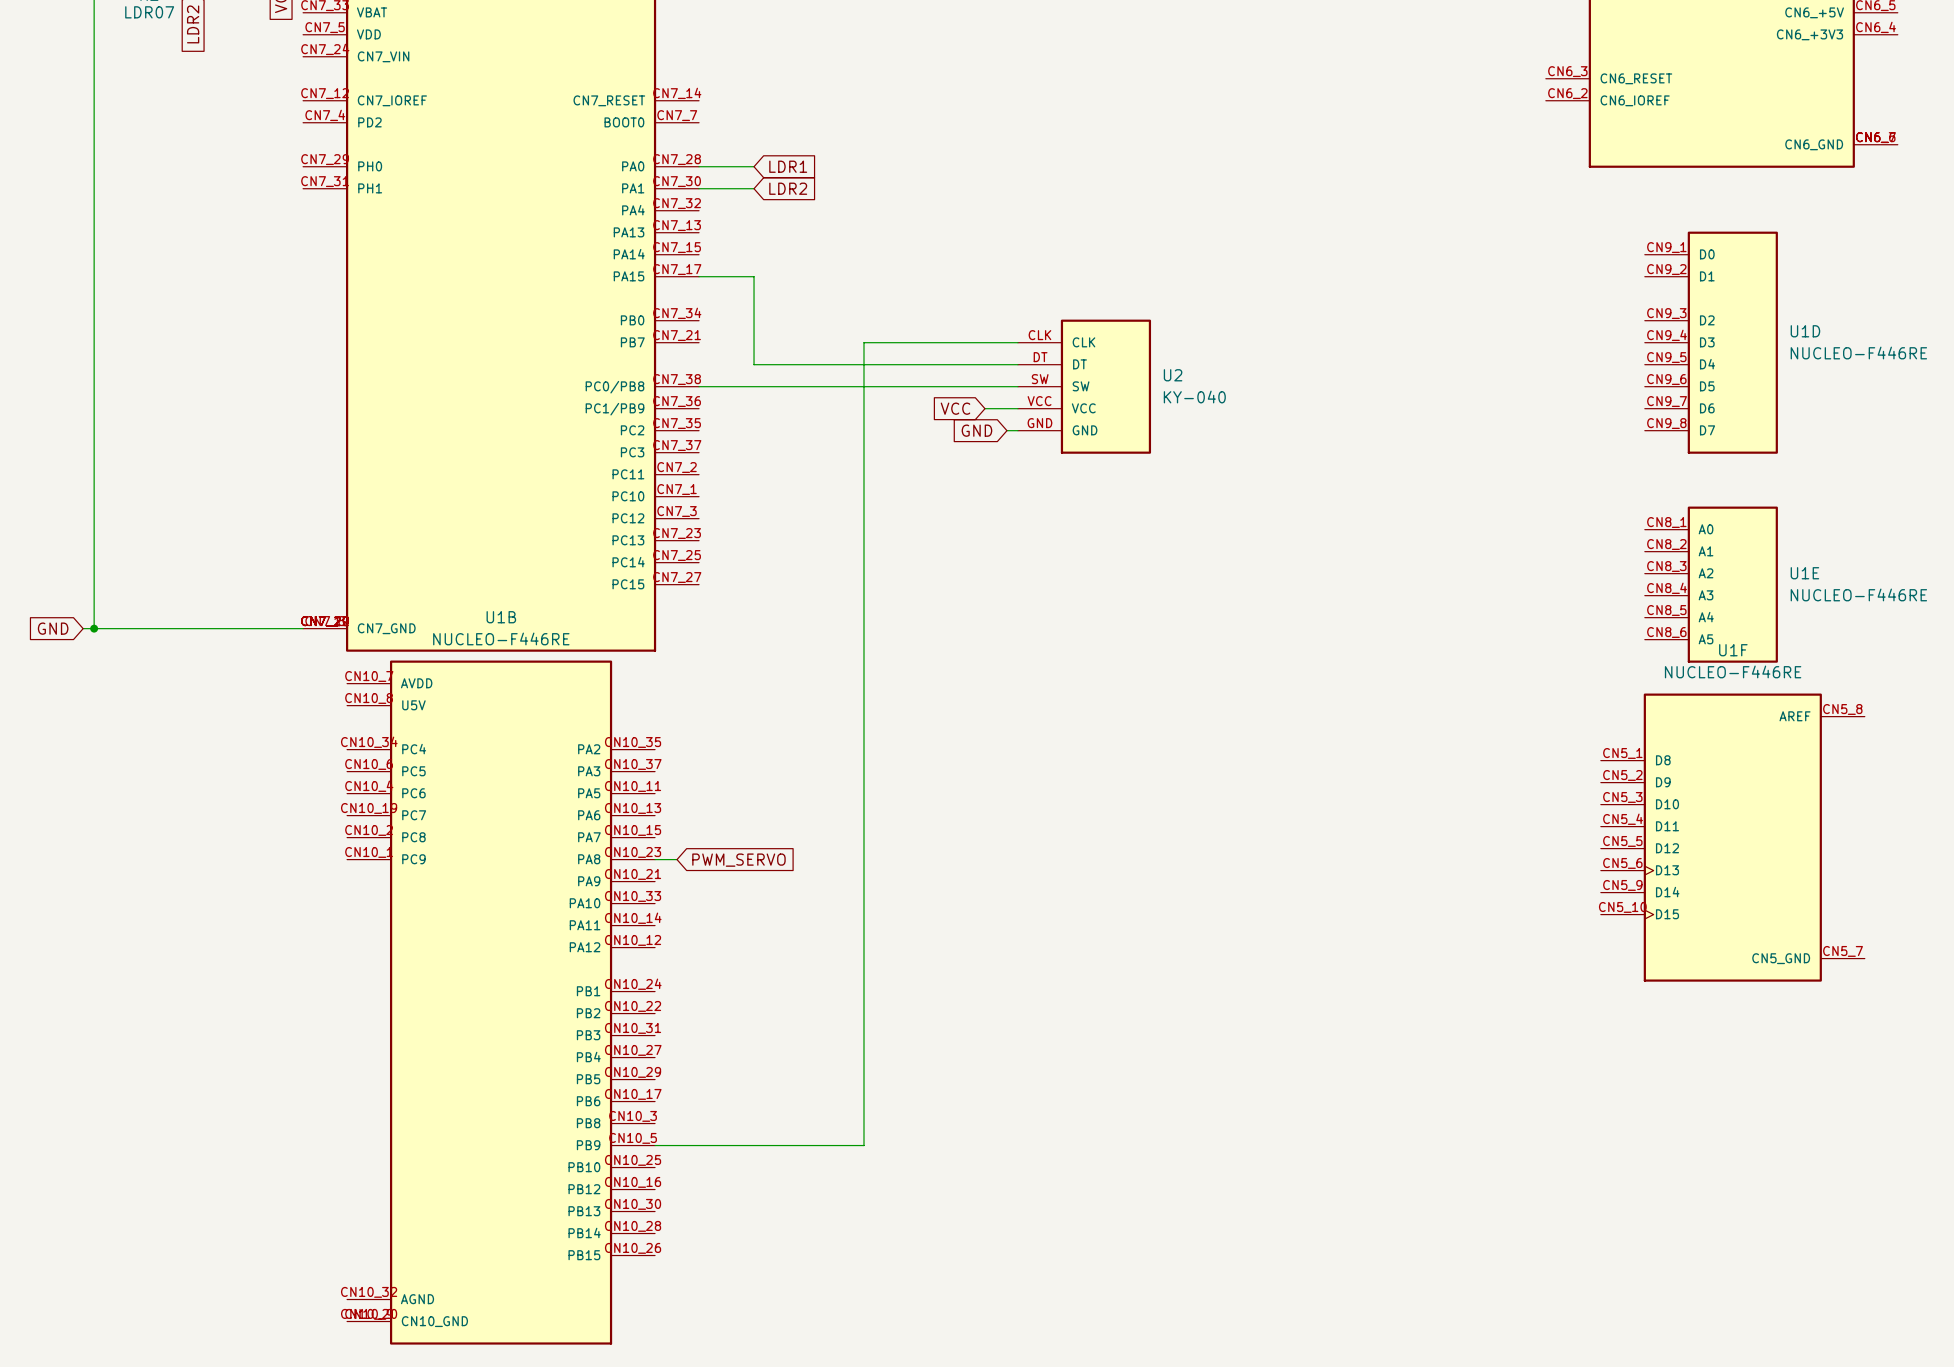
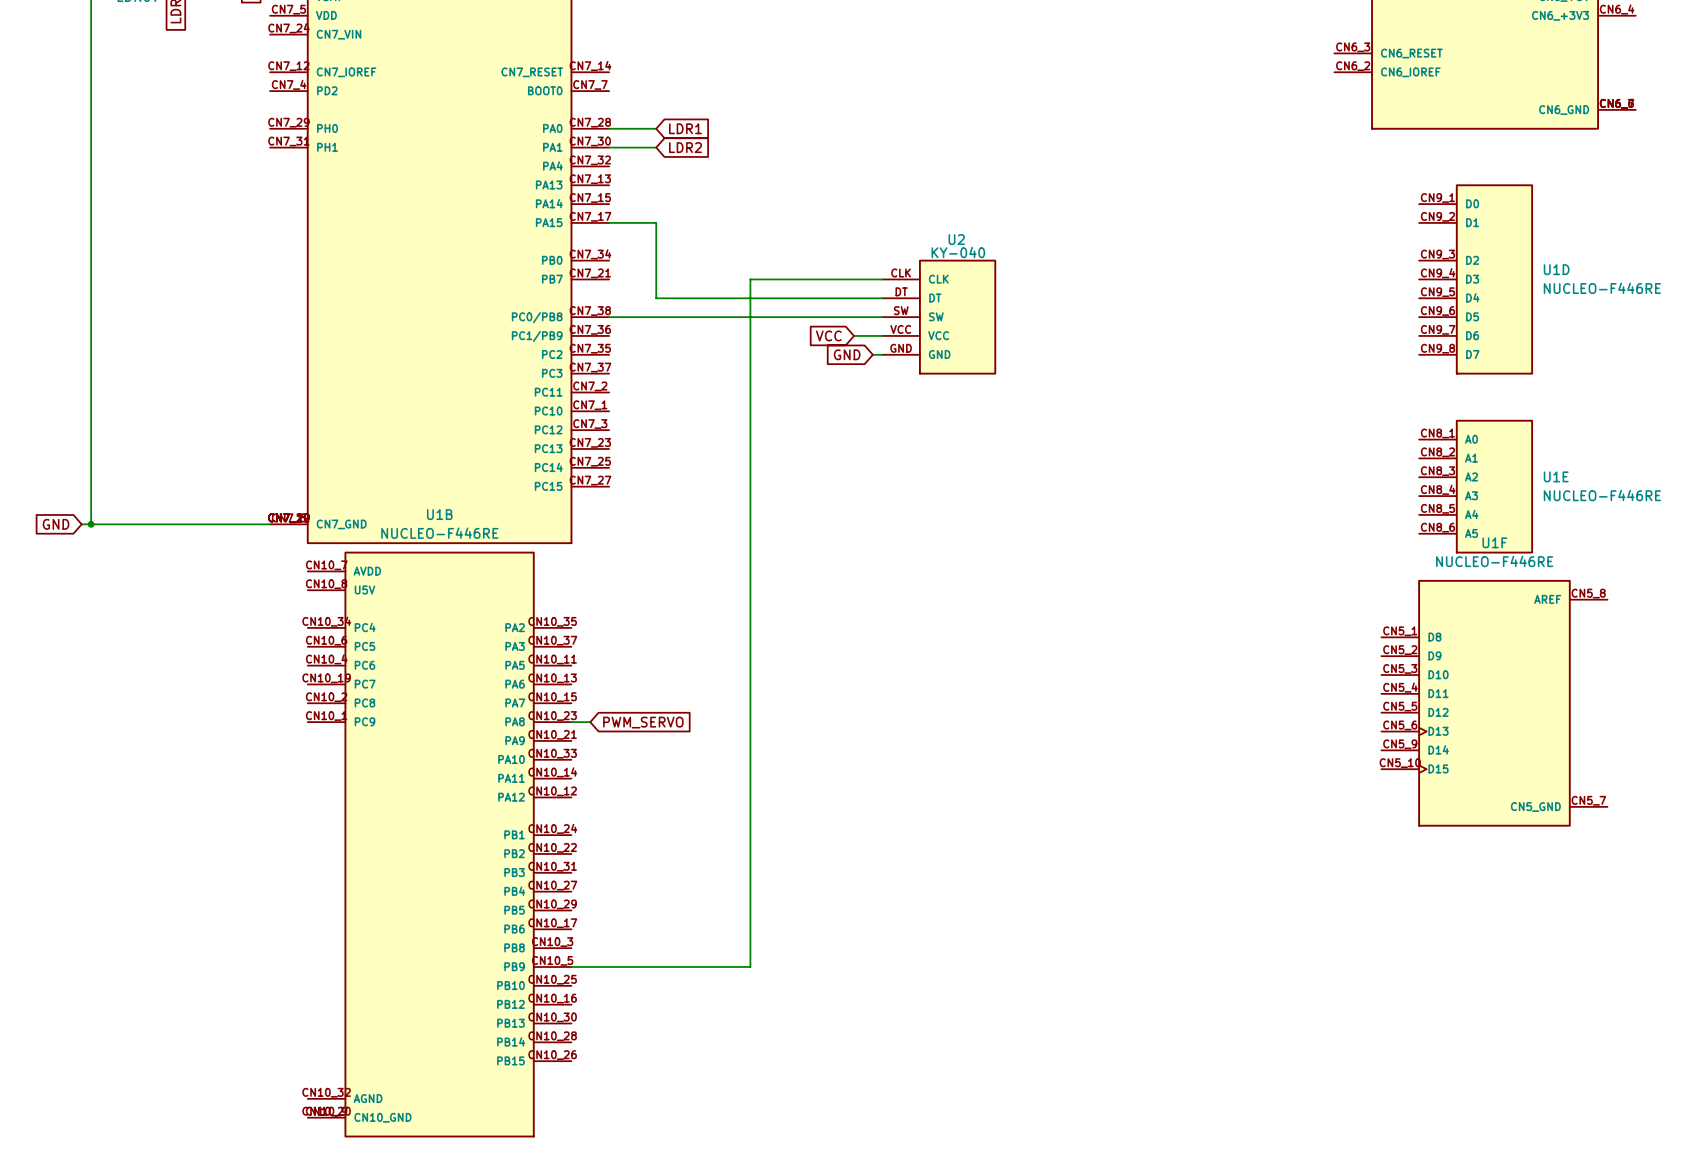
U2 name position: U2 (1173, 375) -> U2 (956, 239)
U2 value position: KY-040 (1194, 397) -> KY-040 (958, 252)

